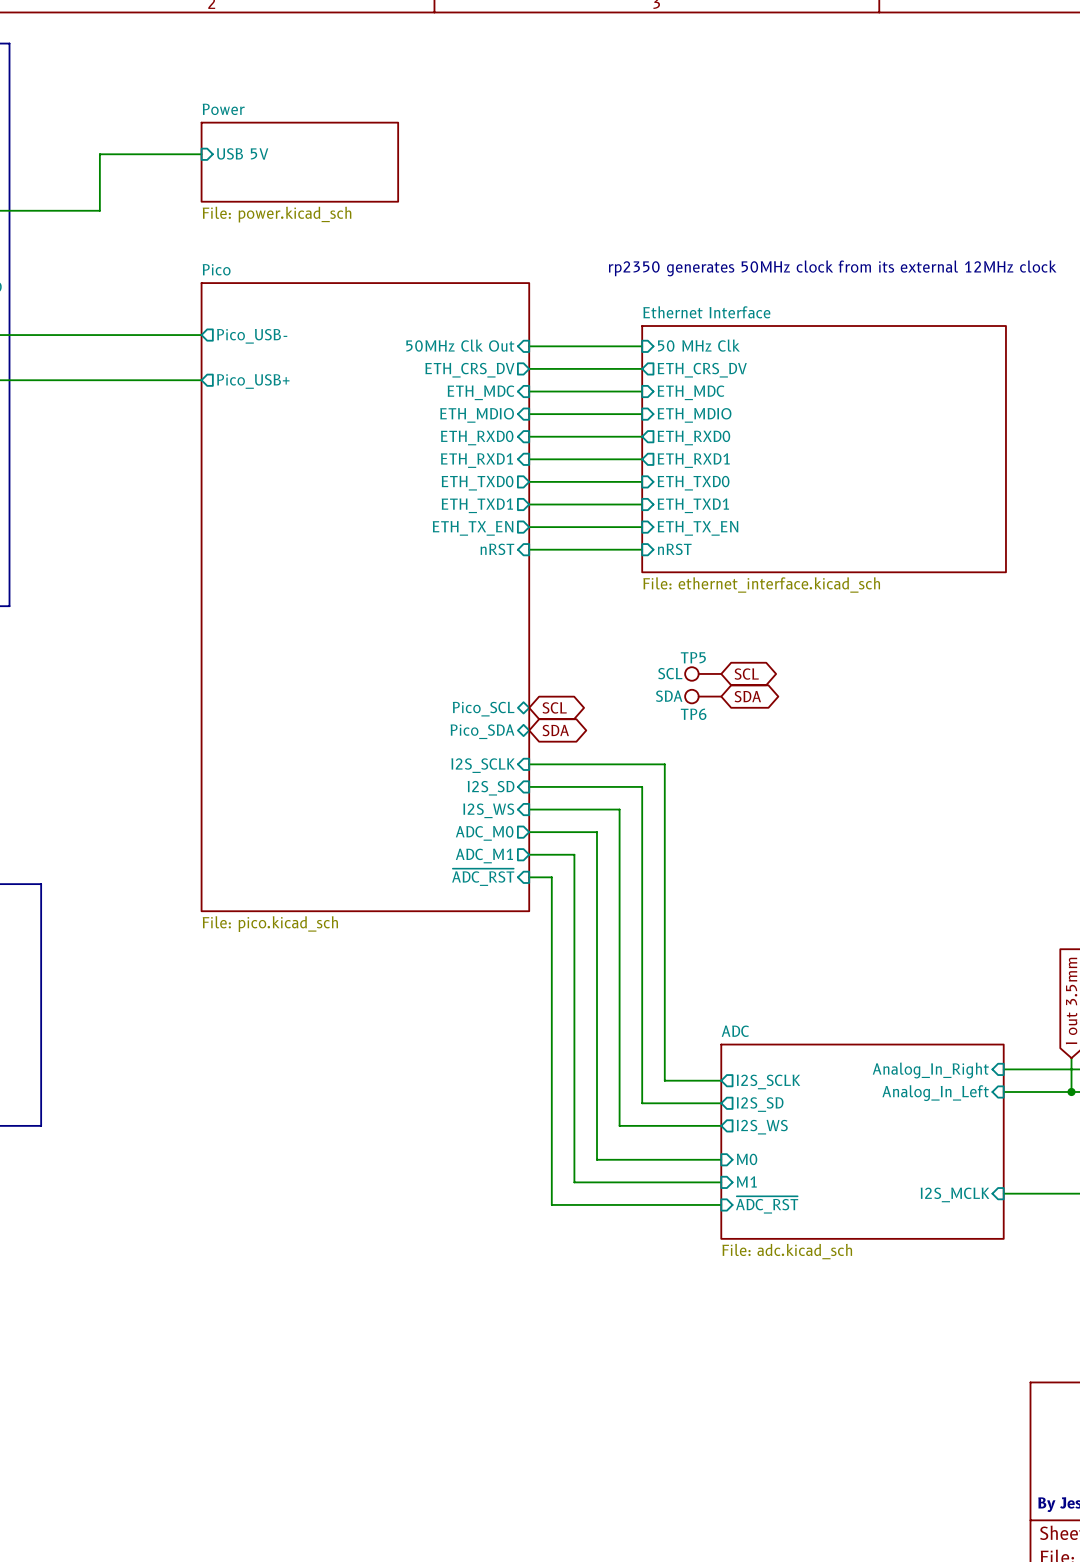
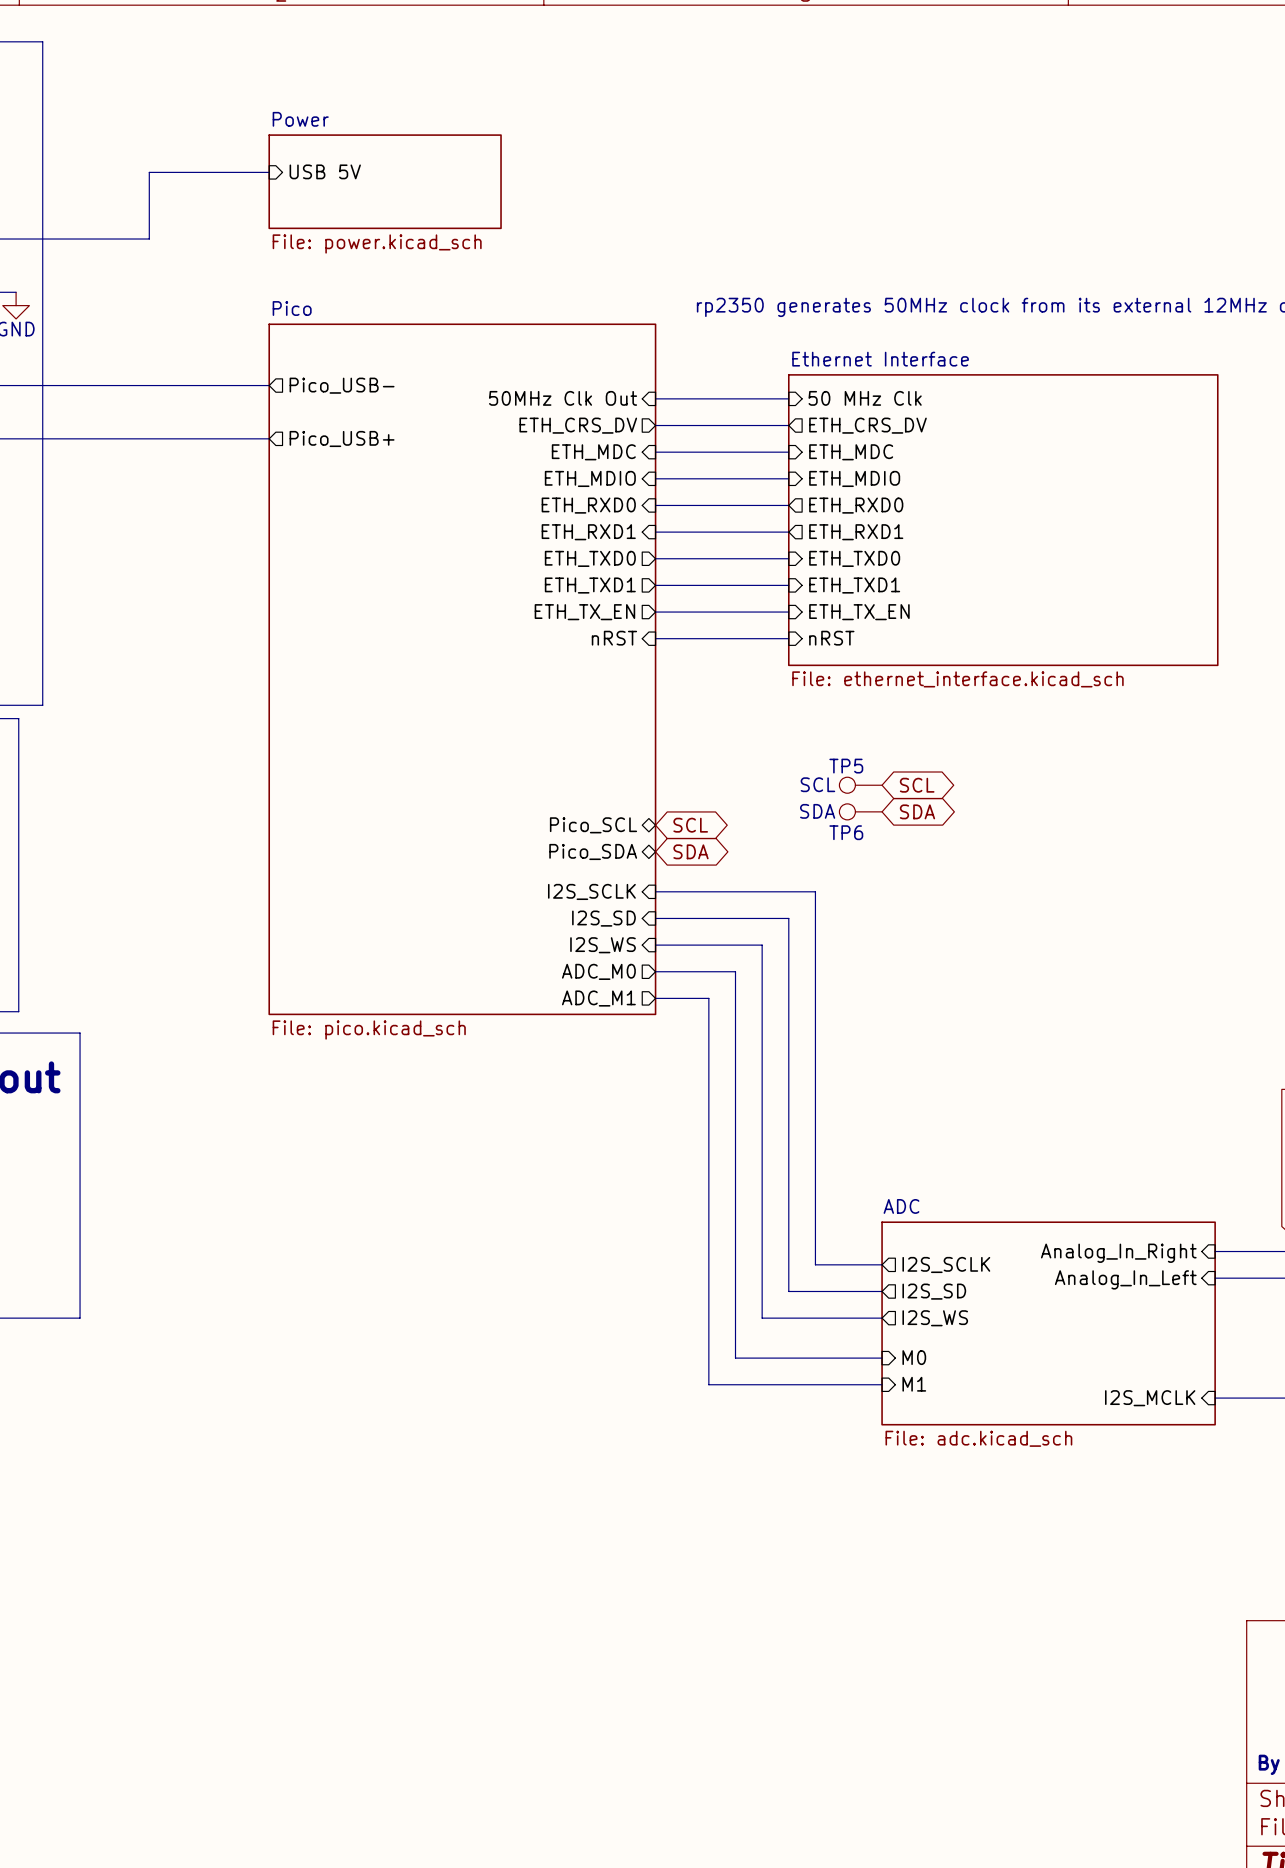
sheet Pico: none -> File: pico.kicad_sch (462, 669)
sheet Pico: File: pico.kicad_sch (365, 597) -> none
sheet pin: ~{ADC_RST} (483, 877) -> none
wire: (529, 877) (551, 877) (551, 1204) (721, 1204) -> none
sheet ADC: none -> File: adc.kicad_sch (1048, 1323)
sheet ADC: File: adc.kicad_sch (862, 1141) -> none
sheet pin: ~{ADC_RST} (767, 1204) -> none

